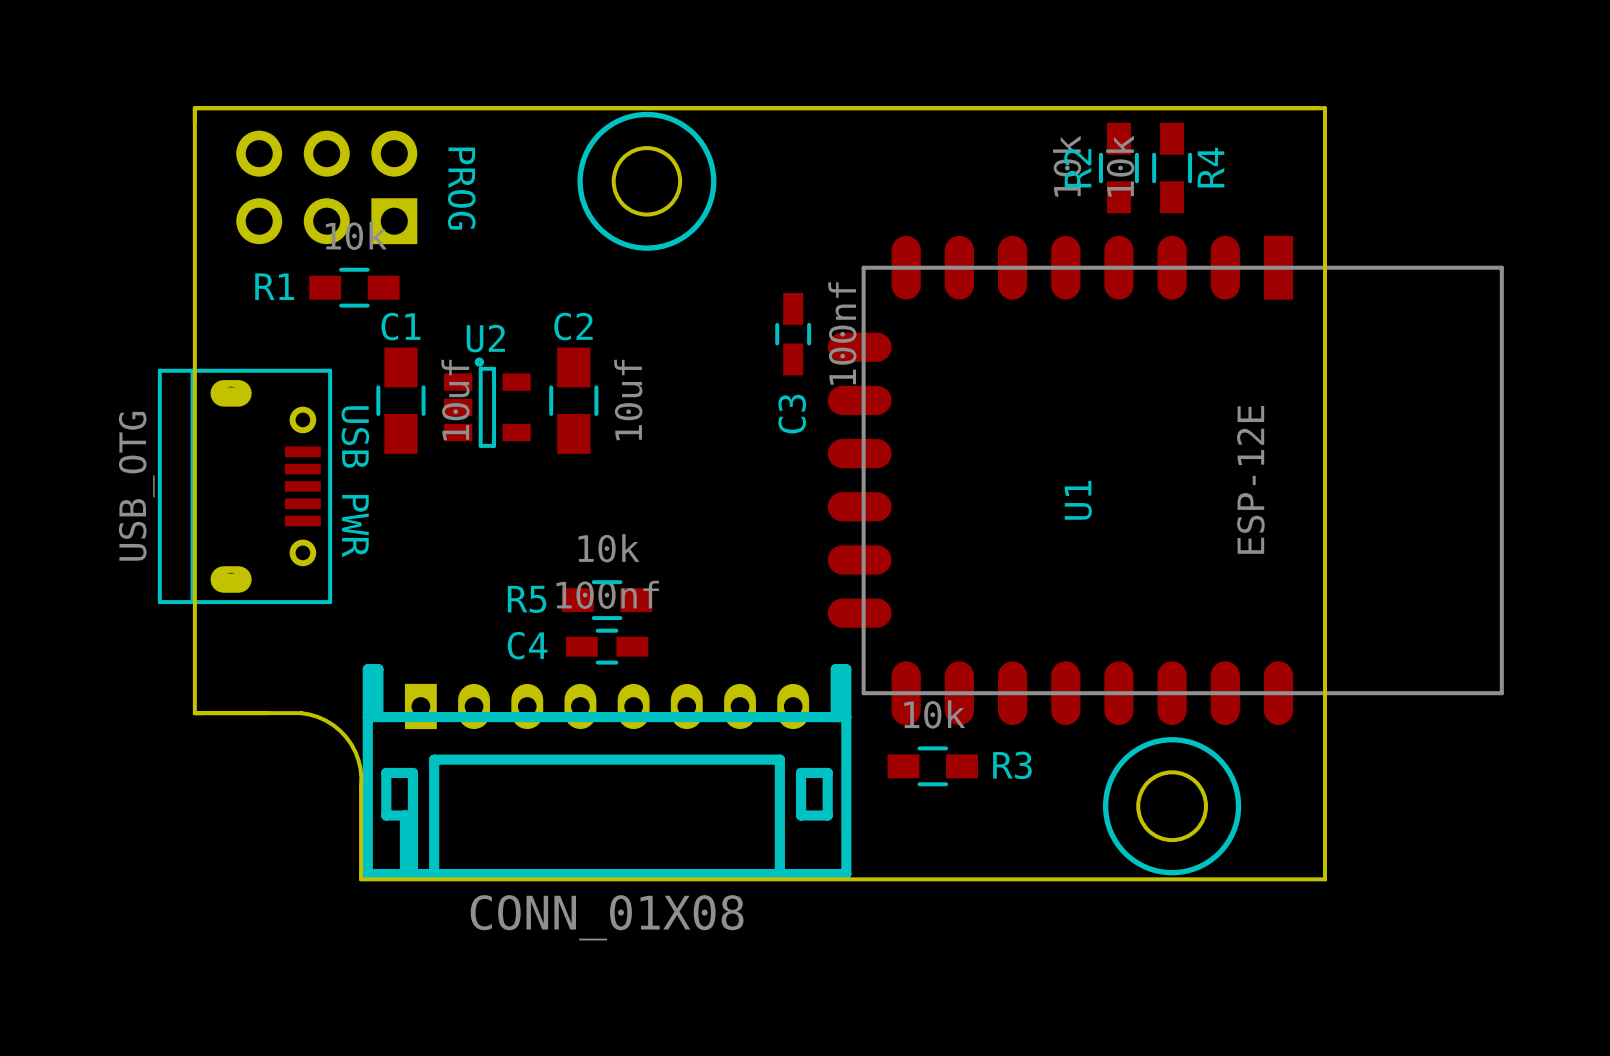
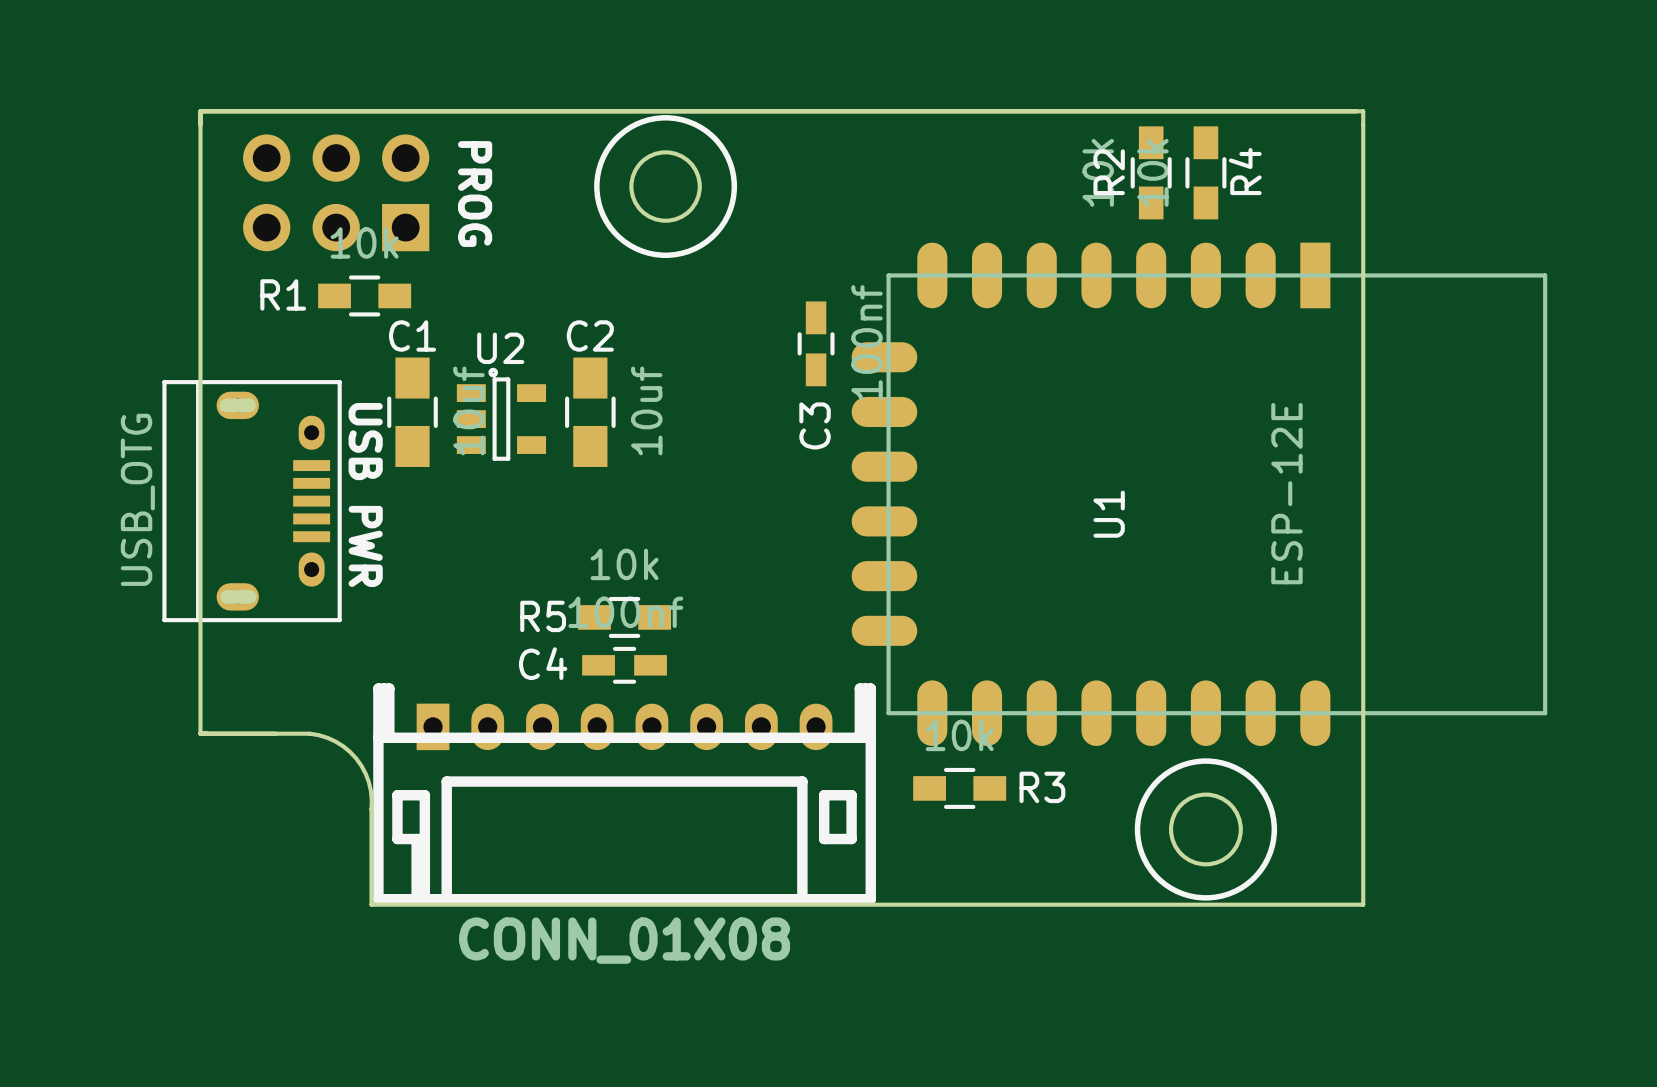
part footprint: [157, 368, 333, 605] -> [162, 380, 342, 623]

